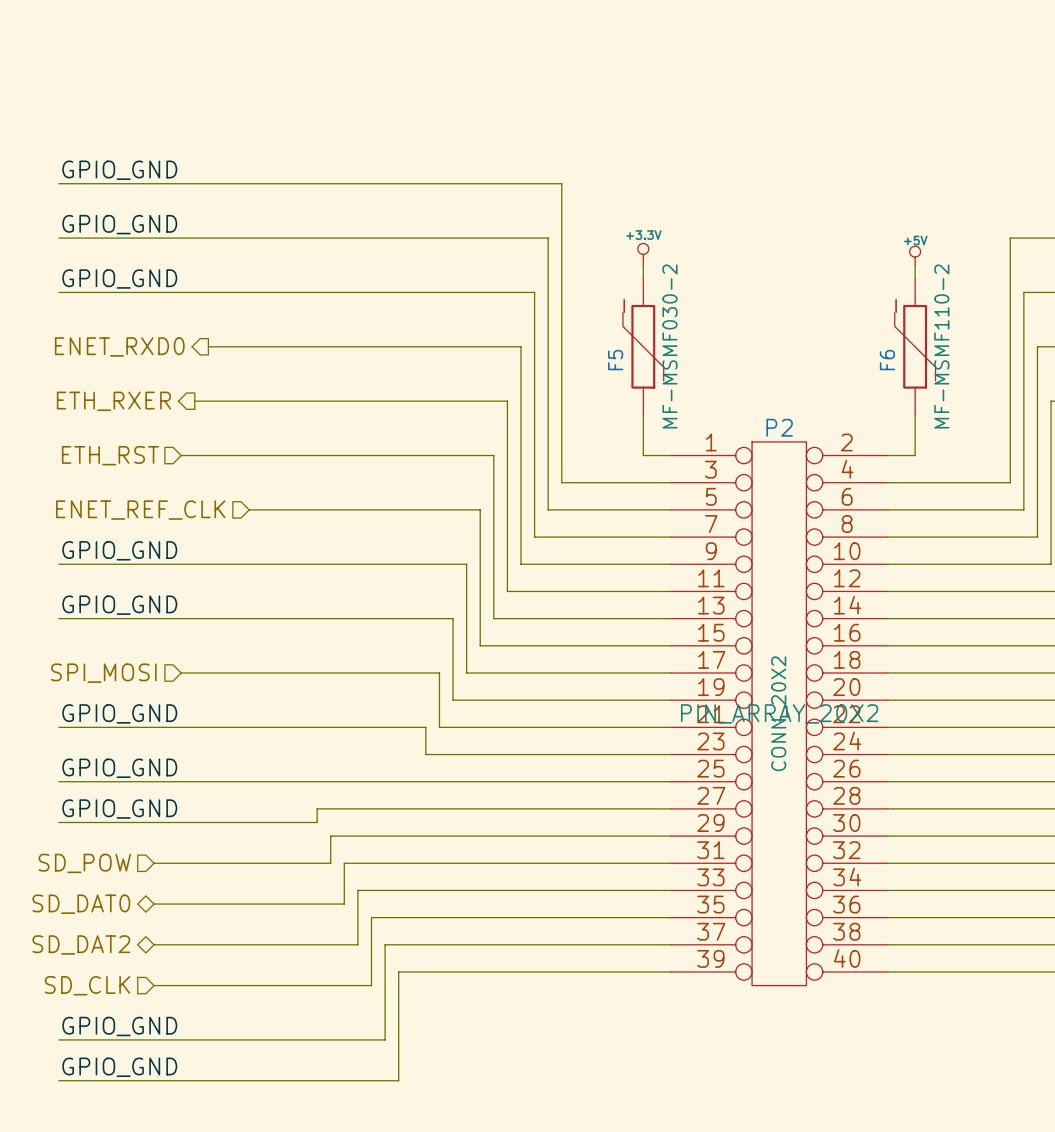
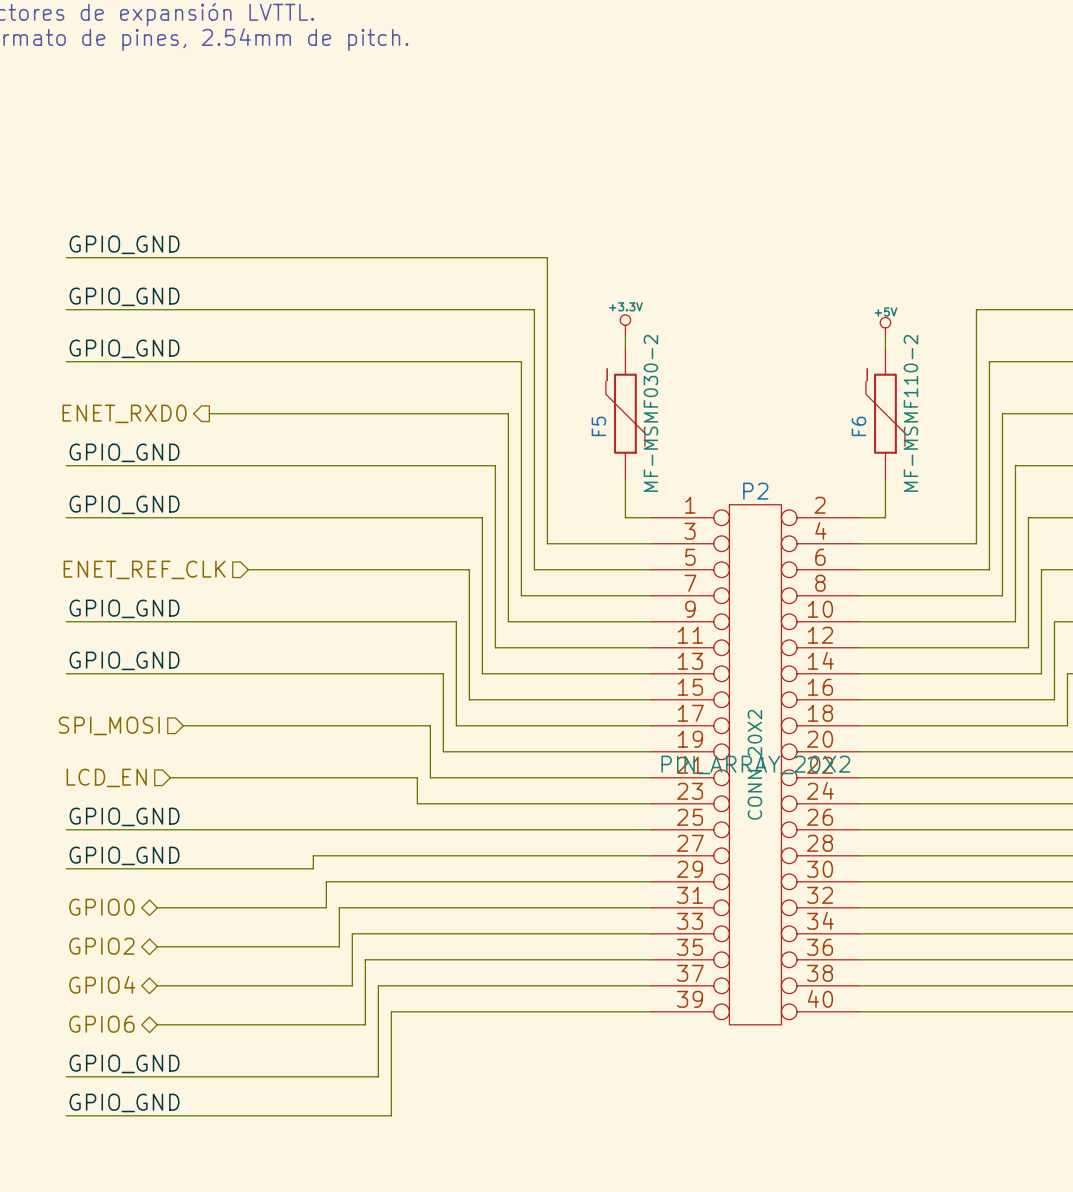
label: none -> GPIO_GND (124, 452)
wire: none -> (66, 465) (196, 465)
hierarchical label: ETH_RXER (113, 401) -> none
label: none -> GPIO_GND (124, 504)
wire: none -> (66, 517) (183, 517)
hierarchical label: ETH_RST (110, 455) -> none
label: GPIO_GND (119, 713) -> none
wire: (58, 727) (167, 727) -> none
hierarchical label: none -> LCD_EN (106, 777)
hierarchical label shape: input (84, 863) -> bidirectional (101, 907)
hierarchical label: SD_POW (84, 863) -> GPIO0 (101, 907)
hierarchical label: SD_DAT0 (81, 904) -> GPIO2 (101, 946)
hierarchical label: SD_DAT2 (81, 944) -> GPIO4 (102, 984)
hierarchical label shape: input (87, 985) -> bidirectional (101, 1024)
hierarchical label: SD_CLK (87, 985) -> GPIO6 (101, 1024)

